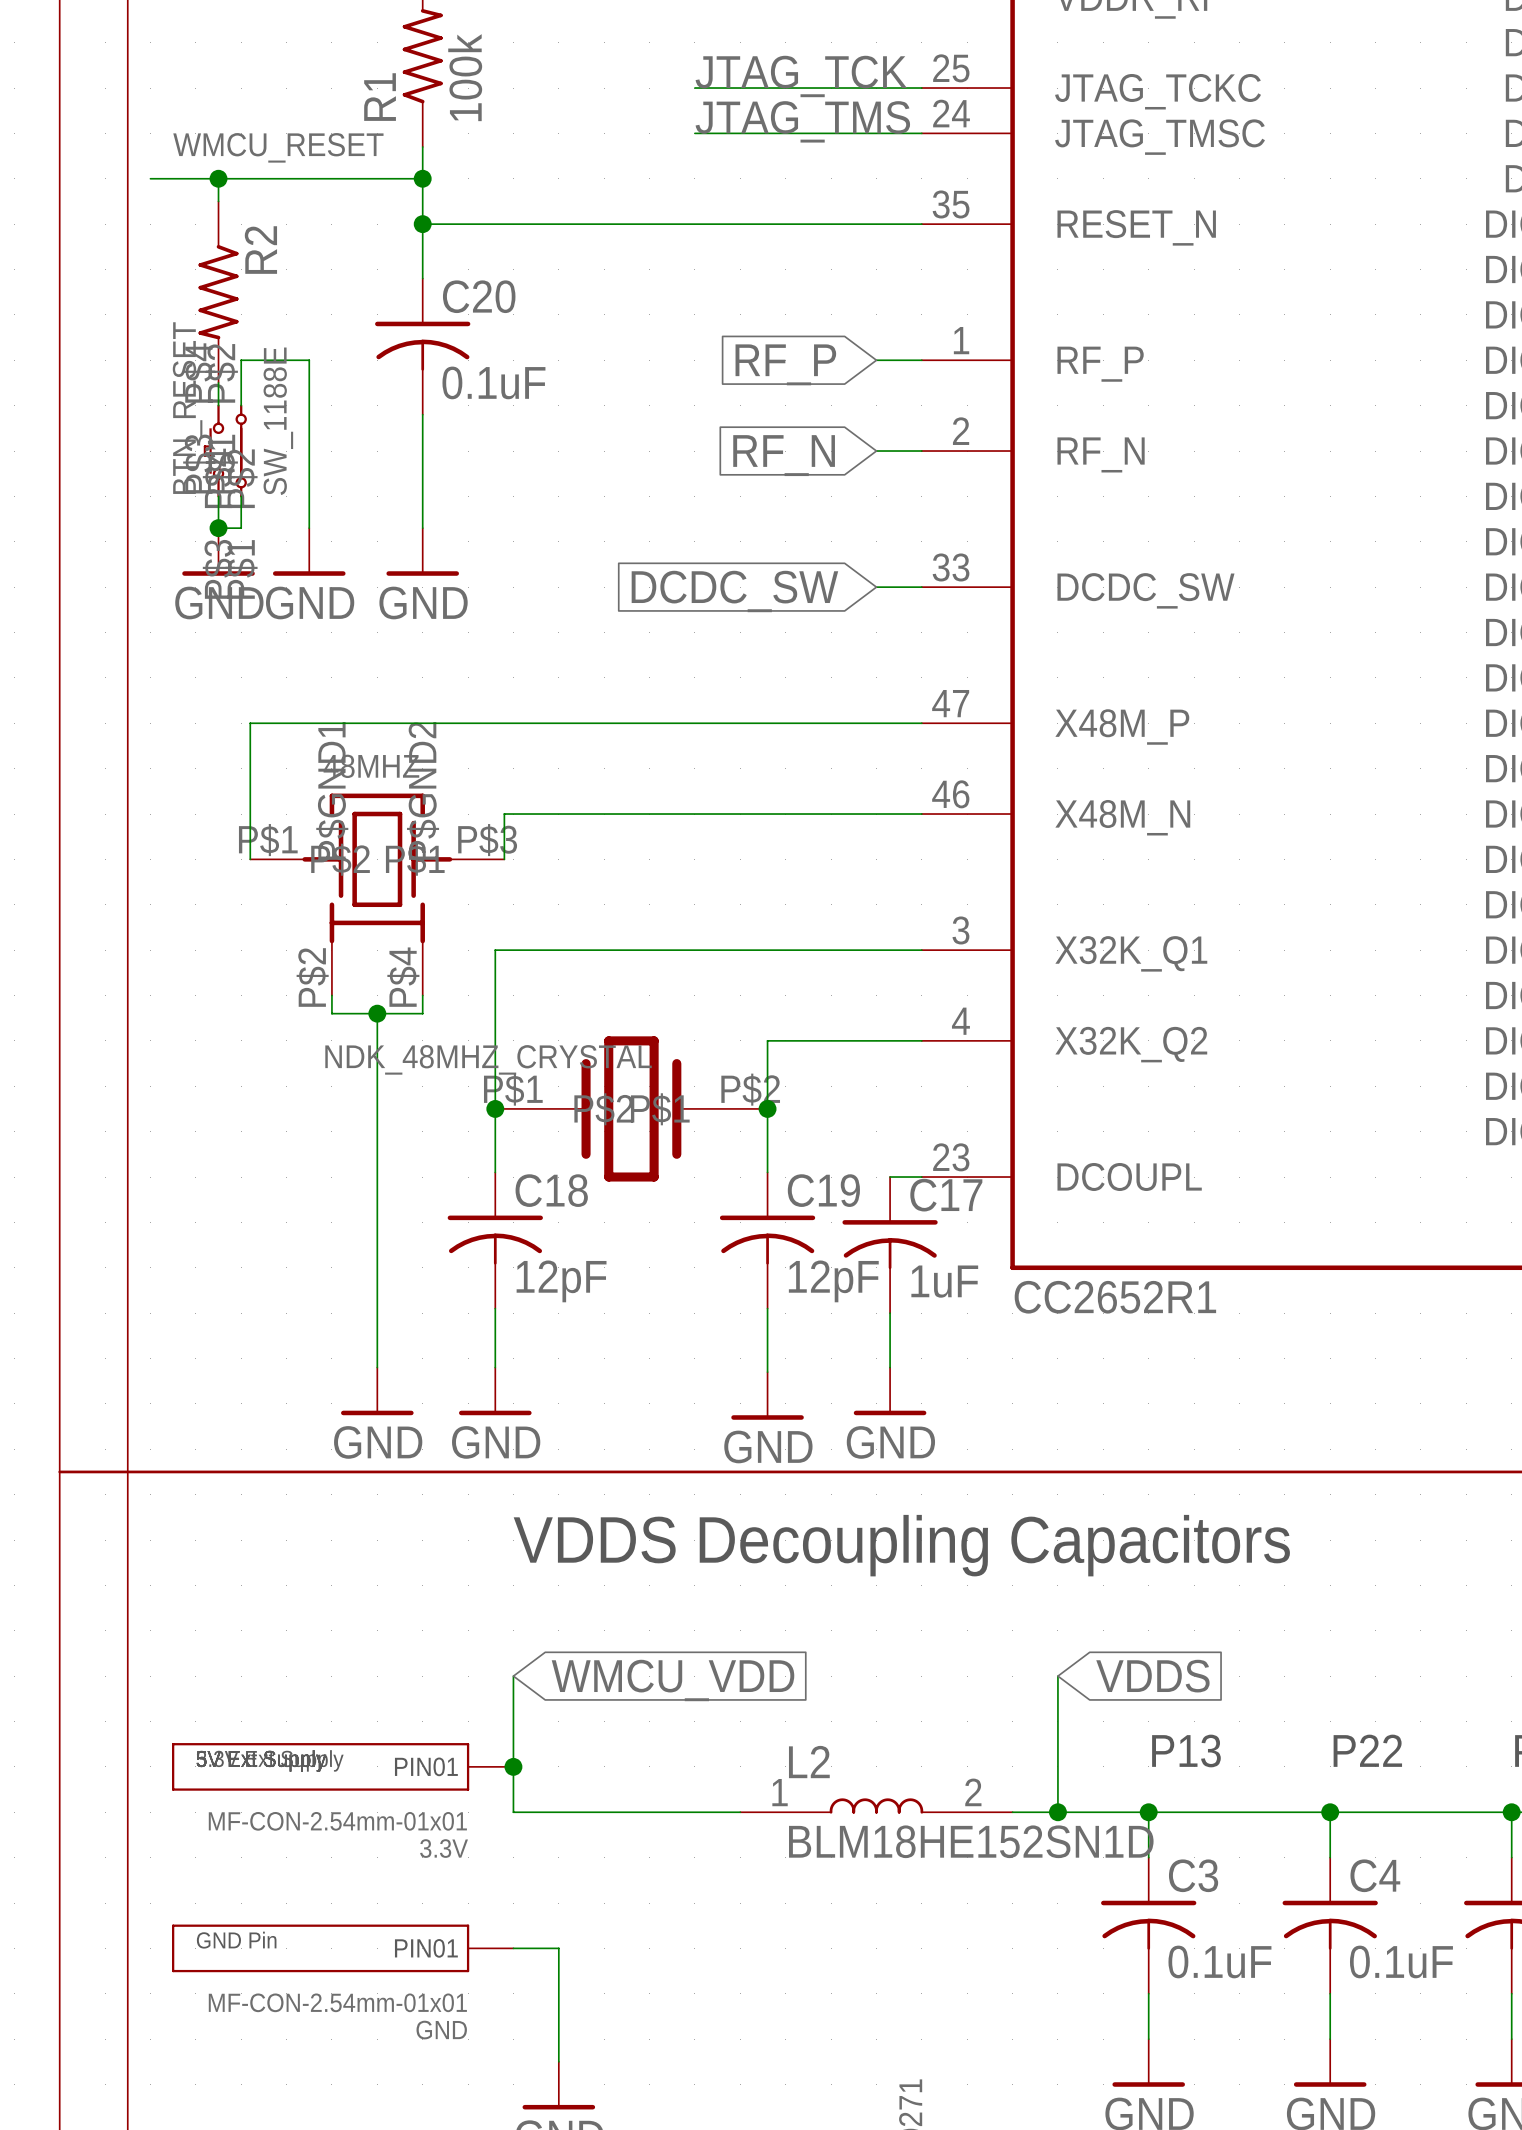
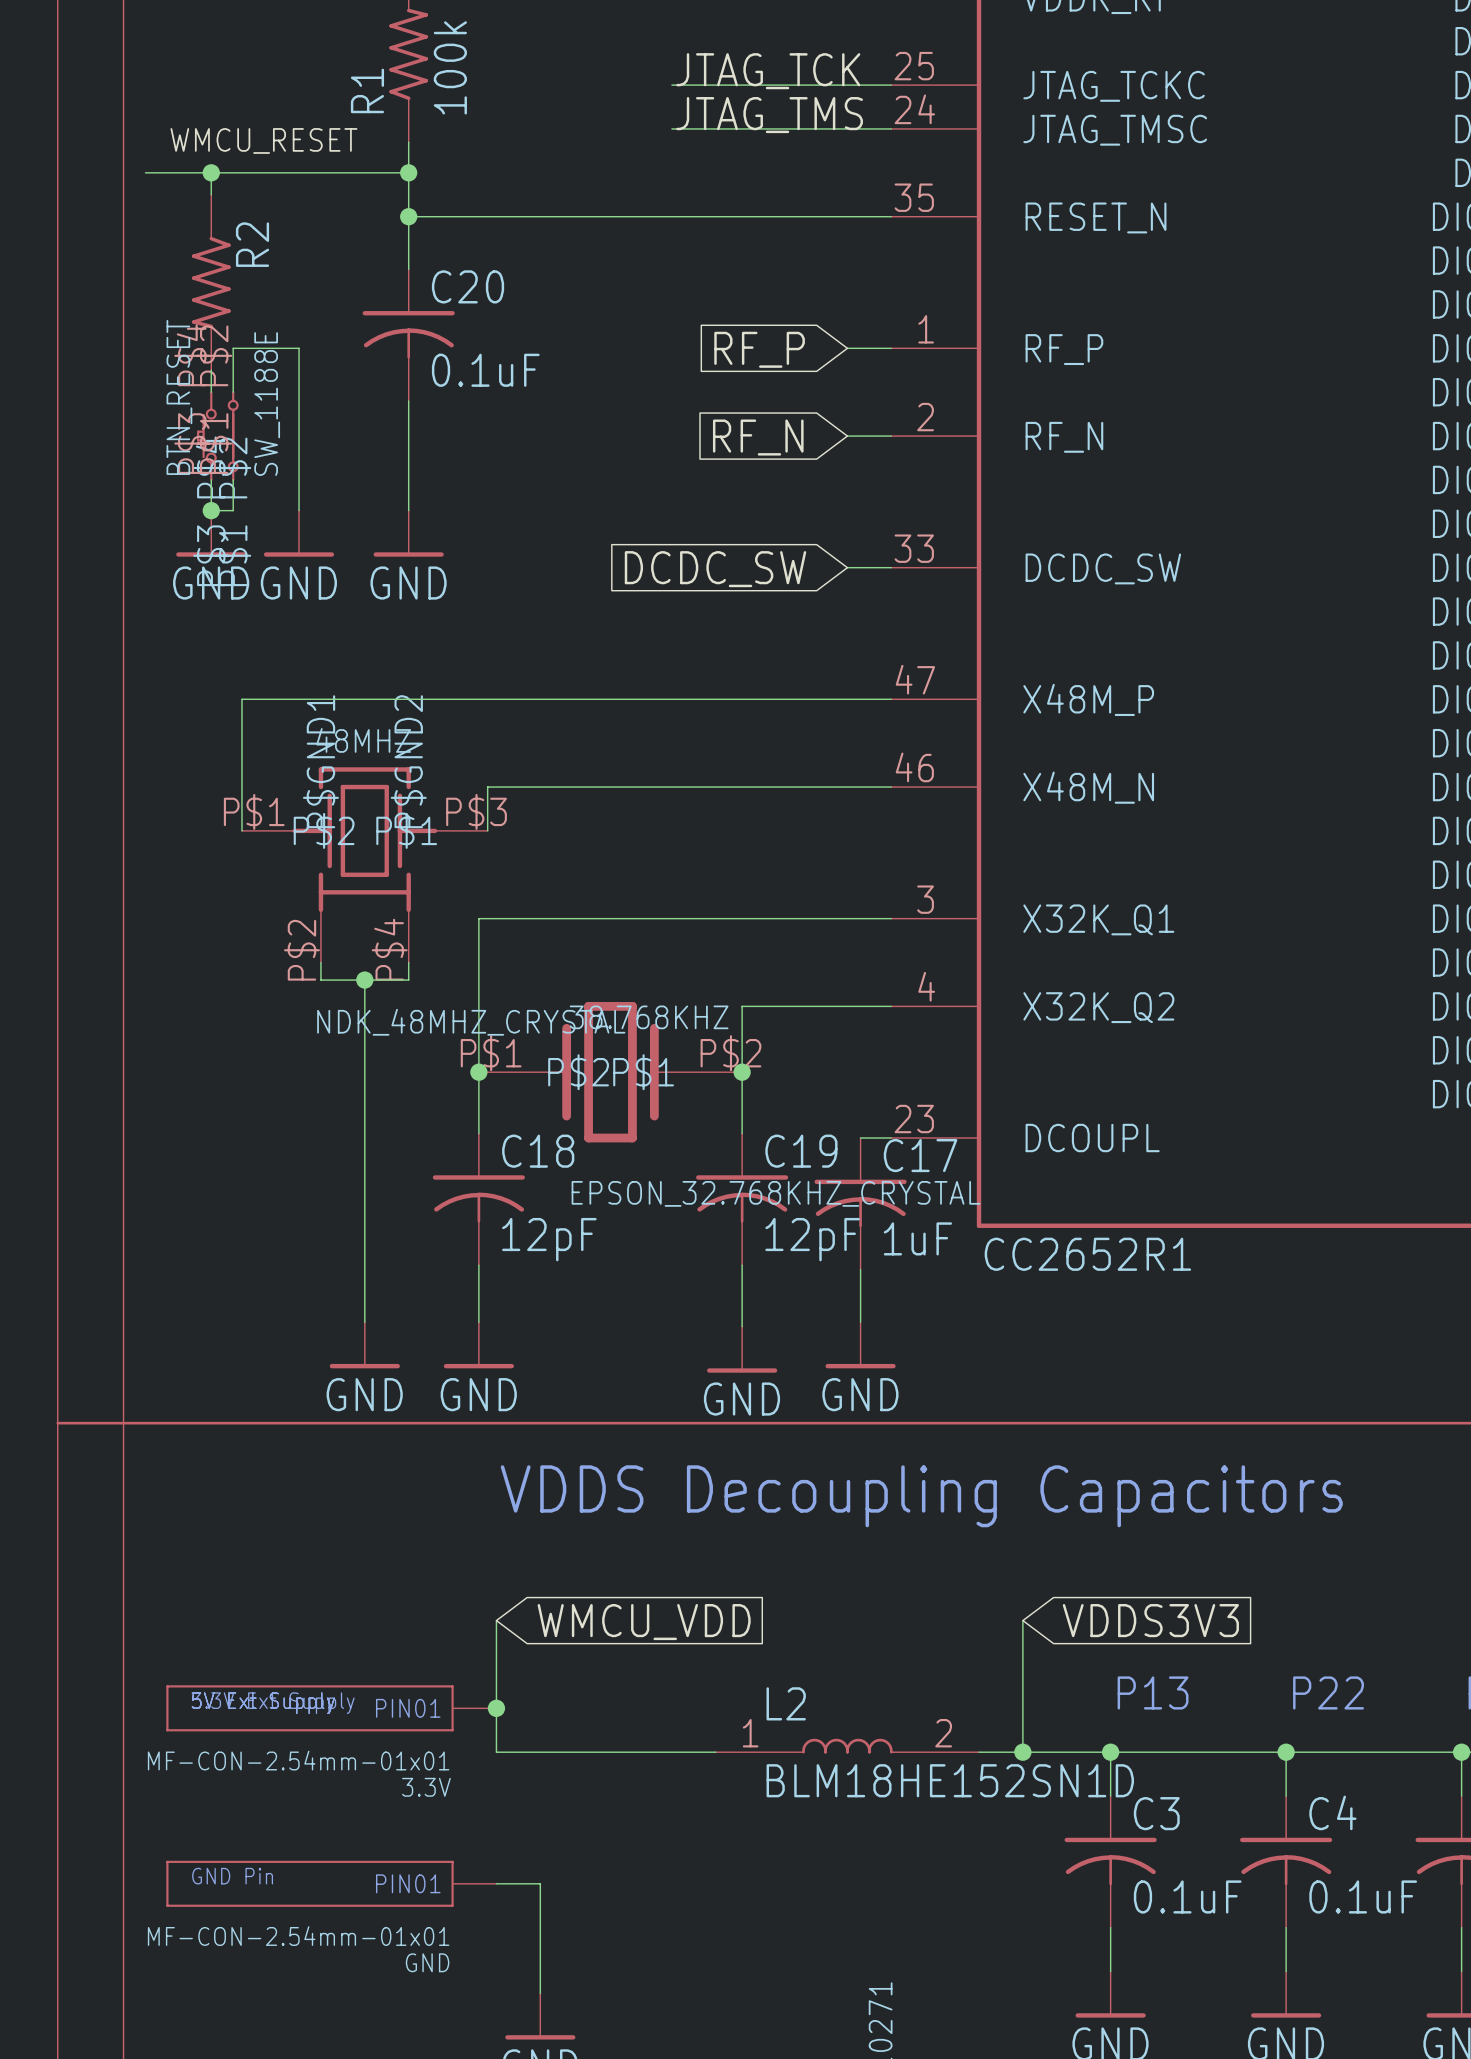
38.768KHZ name: none -> 38.768KHZ (649, 1017)
38.768KHZ value: none -> EPSON_32.768KHZ_CRYSTAL (776, 1193)
global label: VDDS (1152, 1676) -> VDDS3V3 (1150, 1620)

